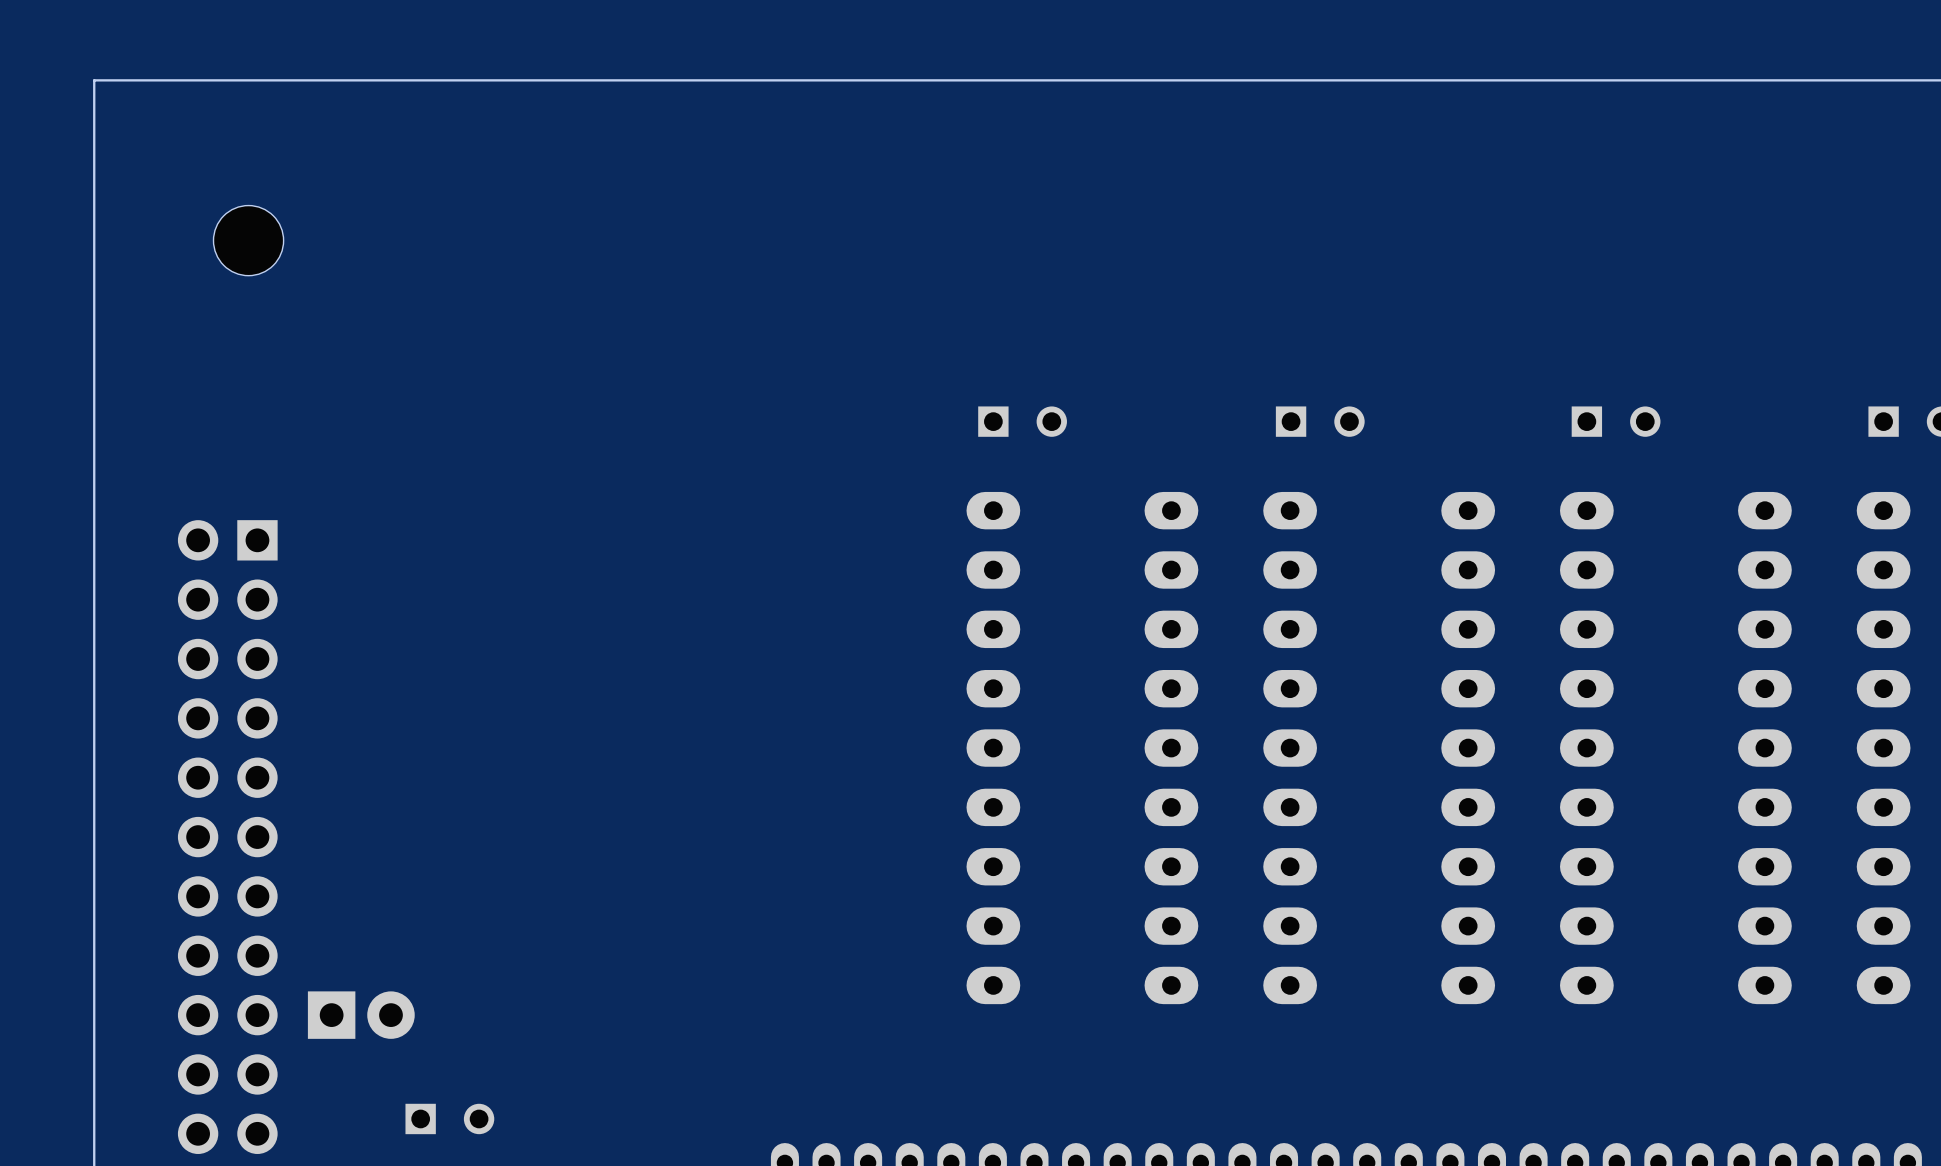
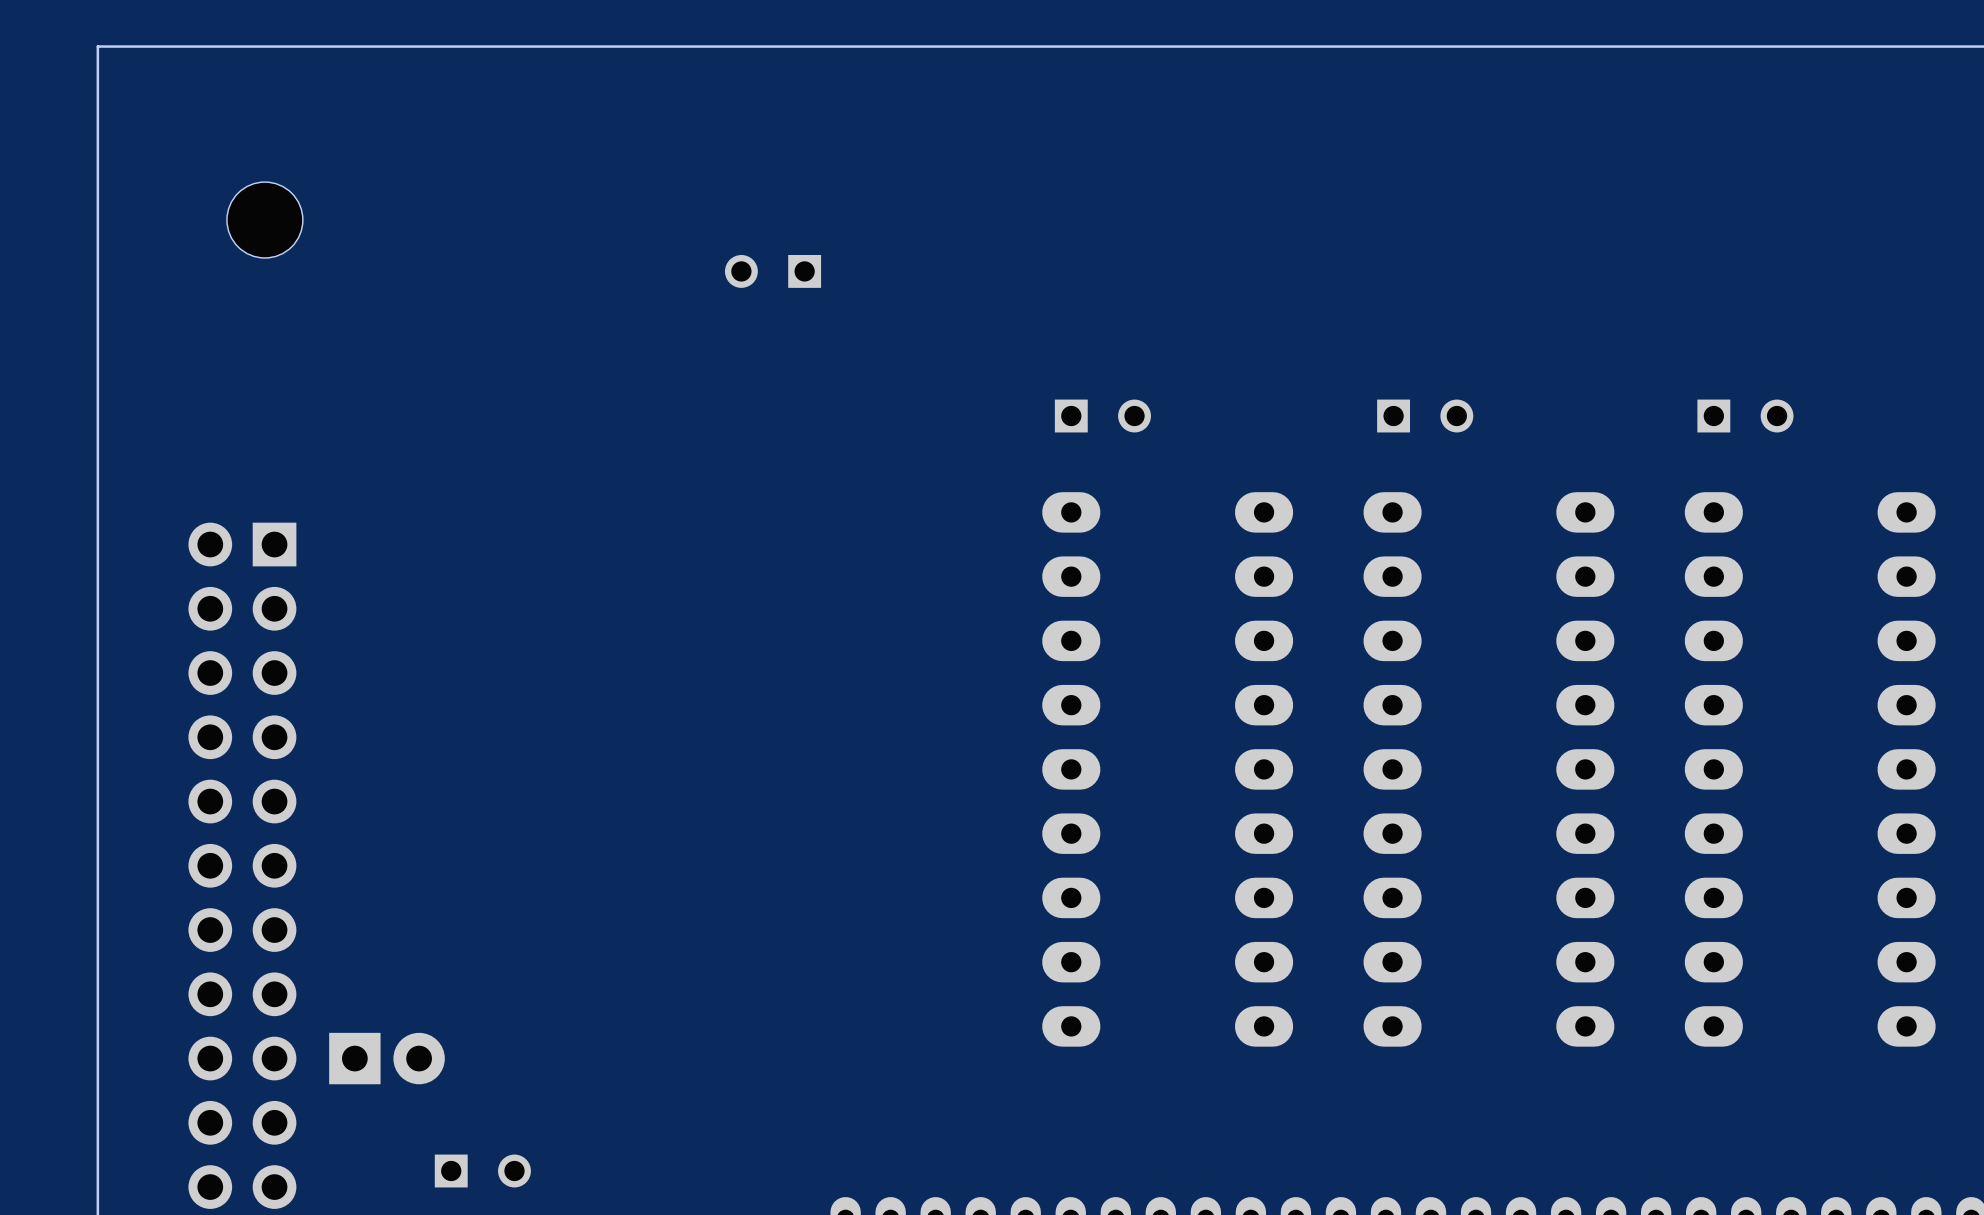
part: none -> (773, 271)

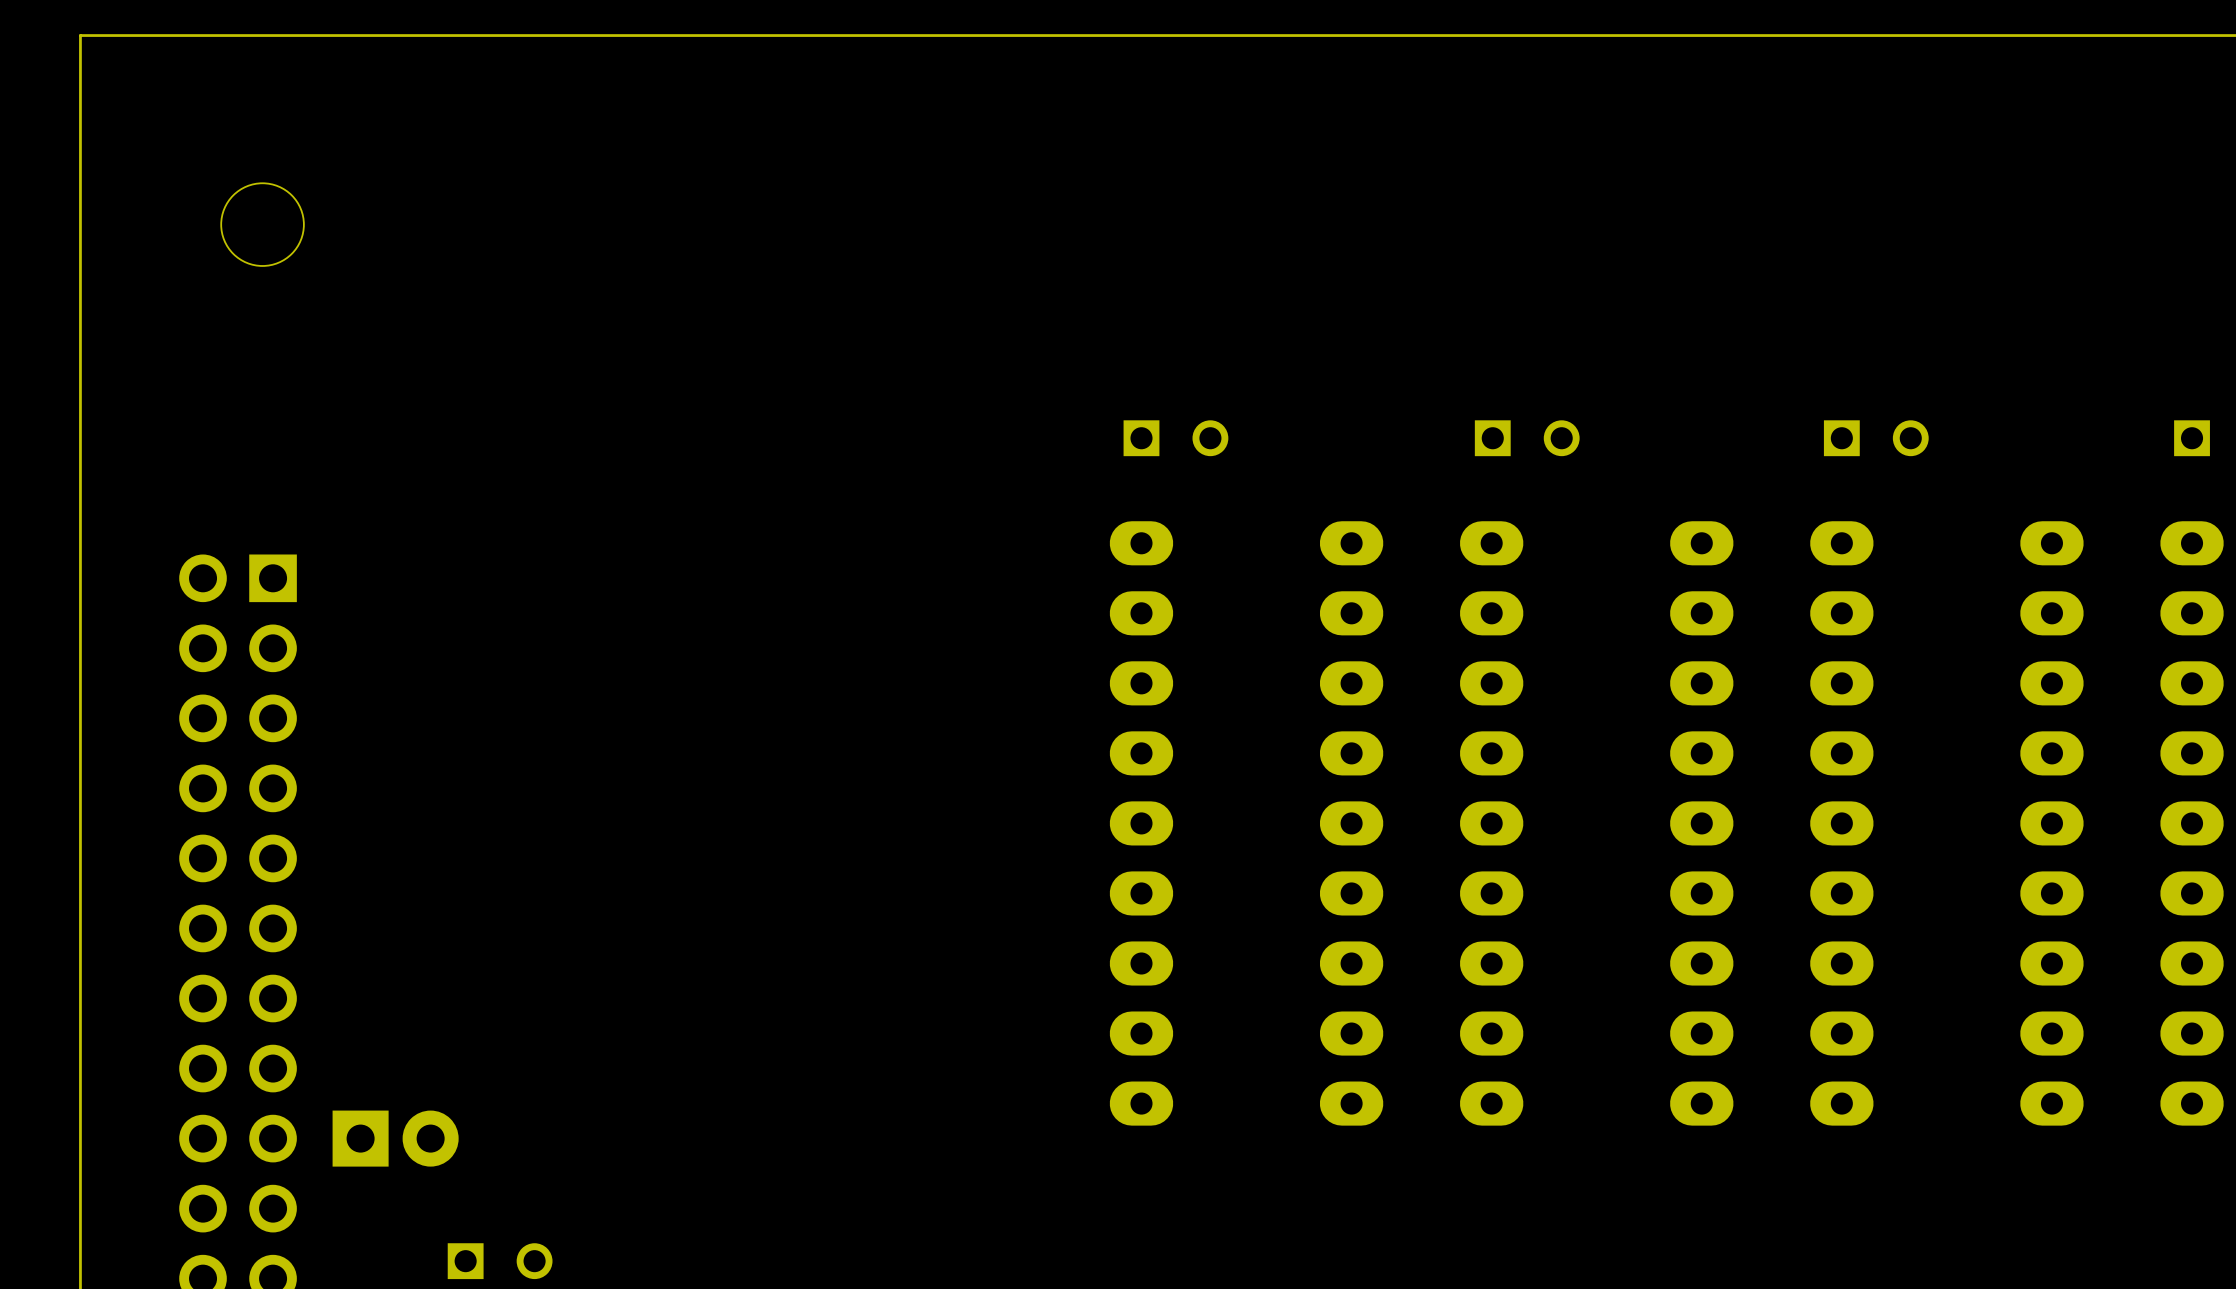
part: (773, 271) -> none

